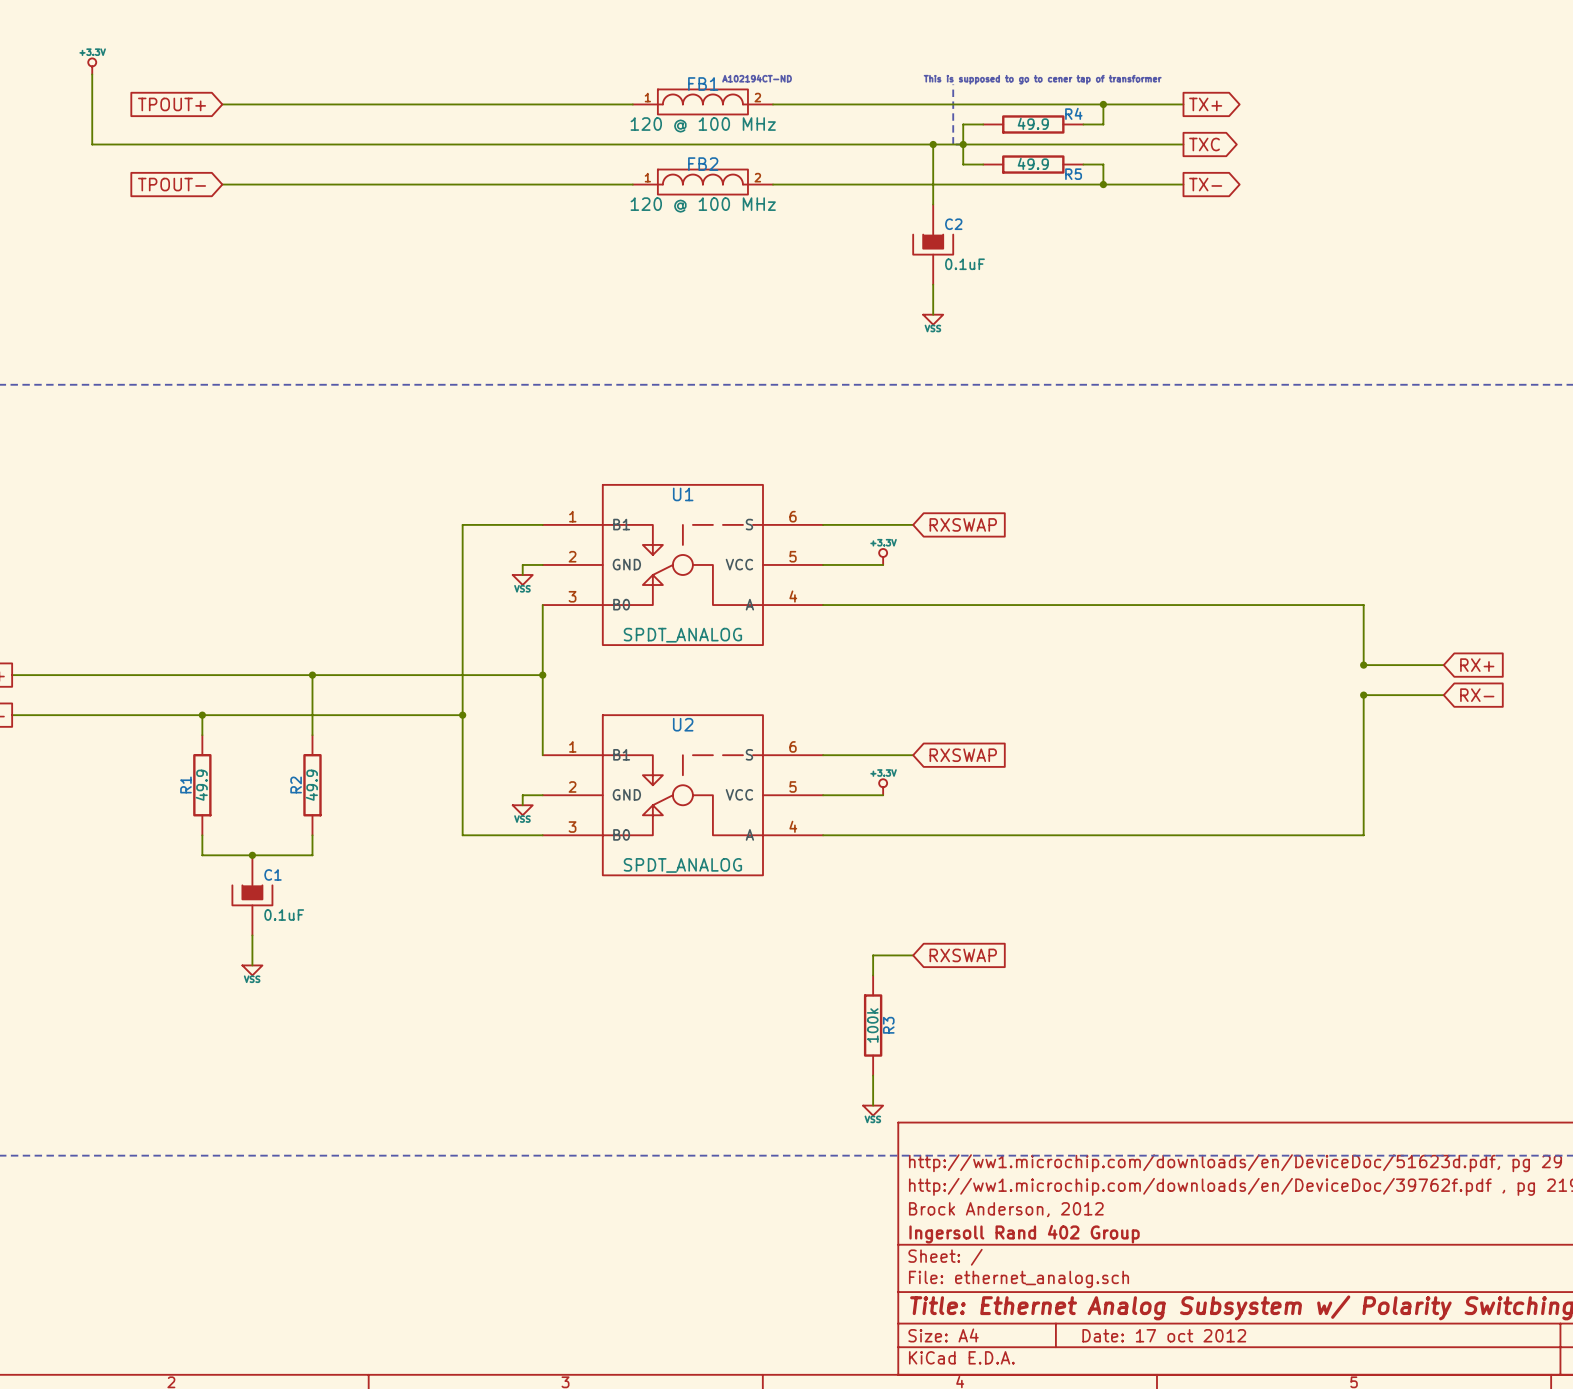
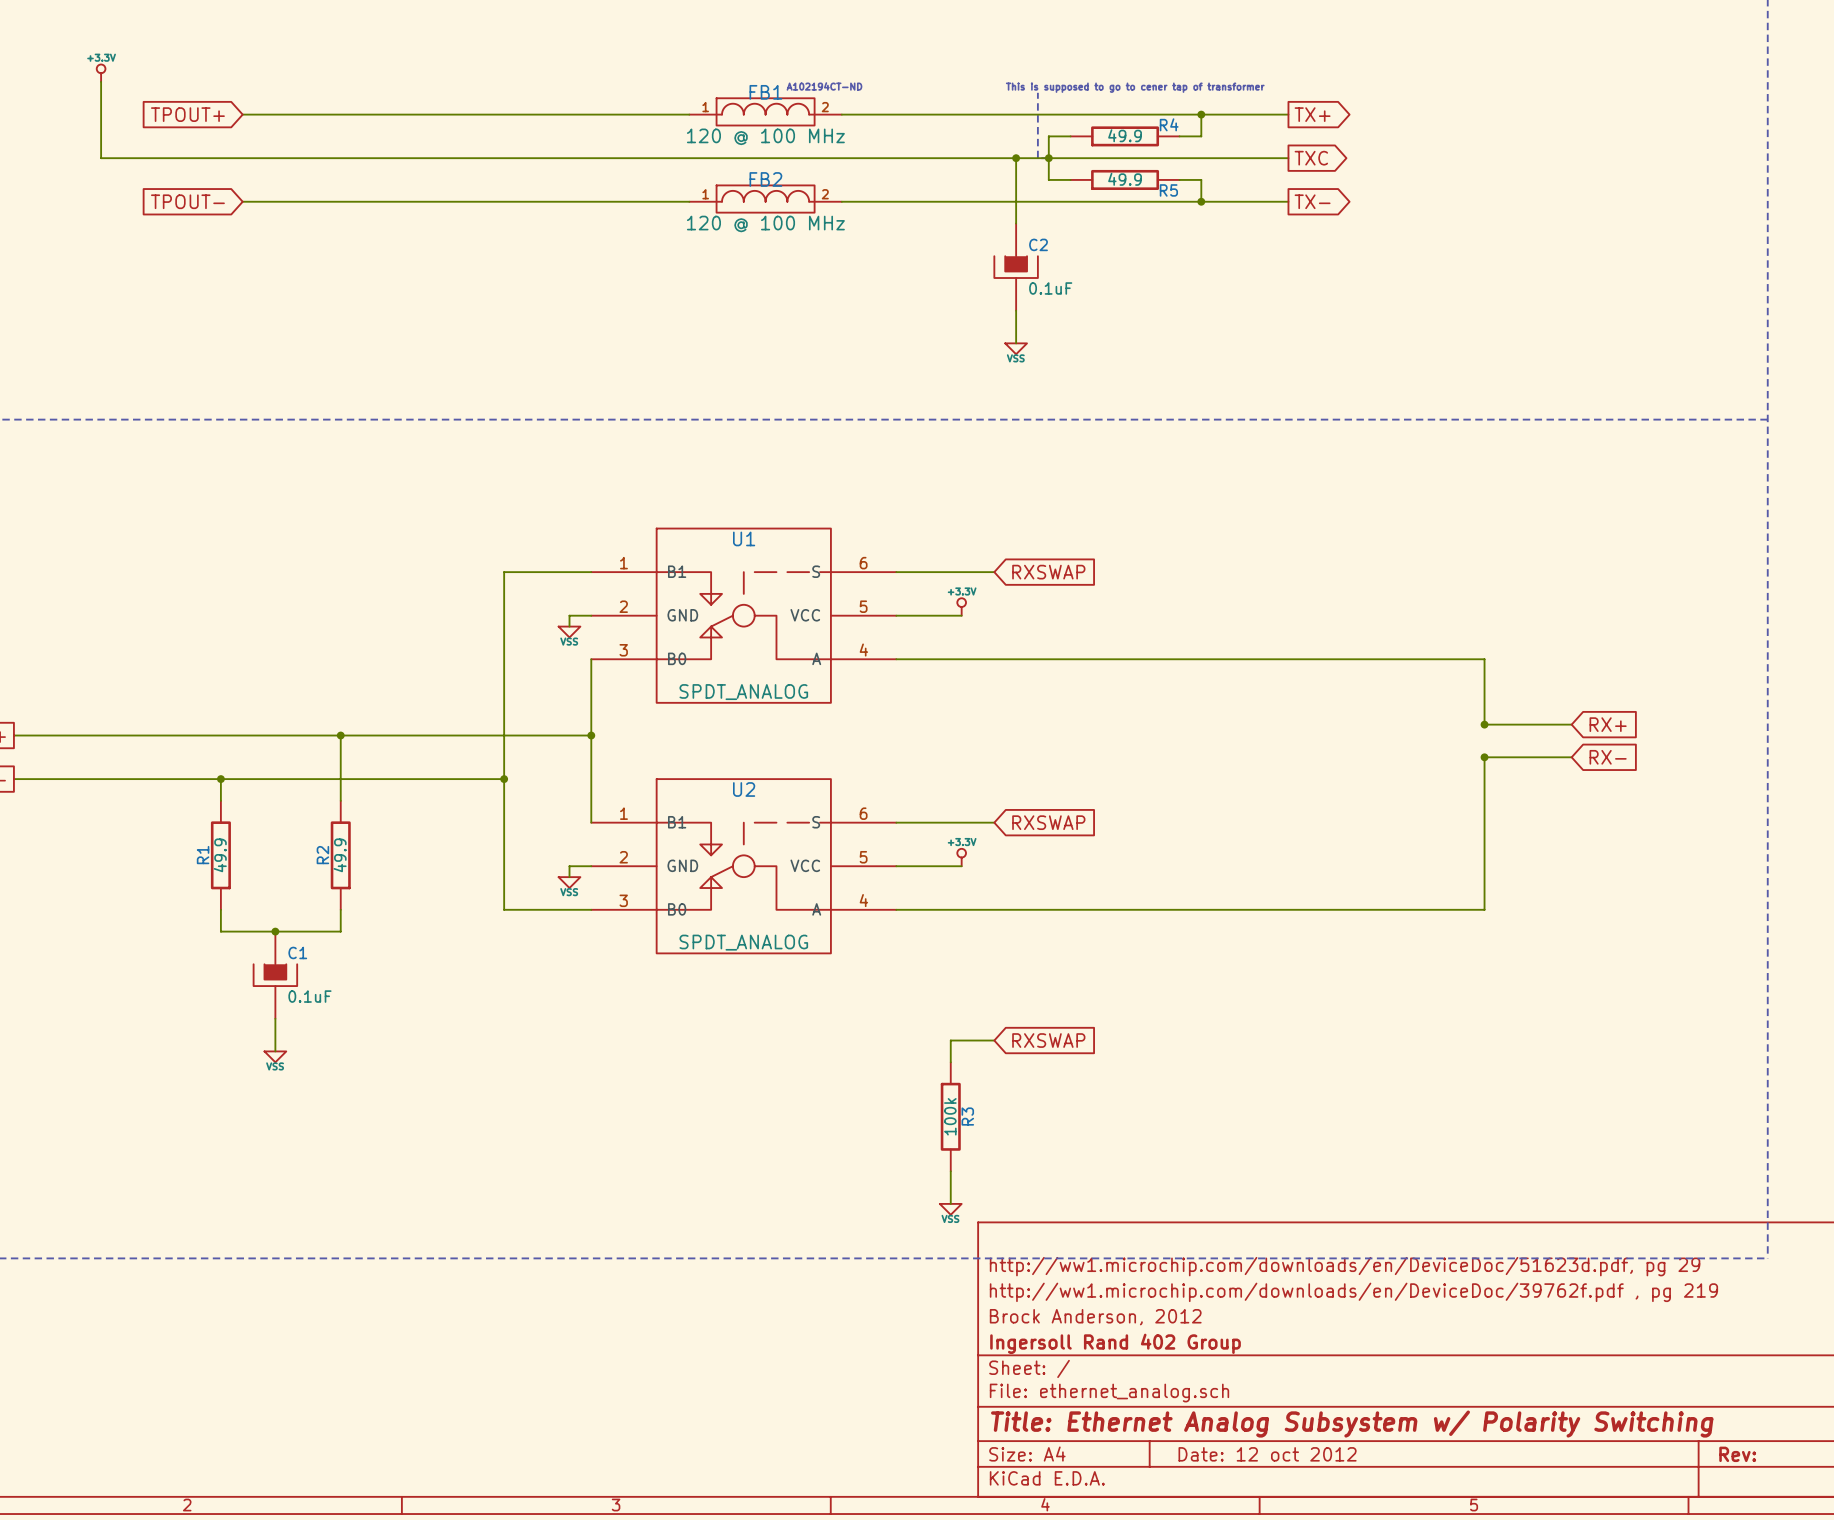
title block: Date: 17 oct 2012 (1164, 1335) -> Date: 12 oct 2012 (1267, 1454)

